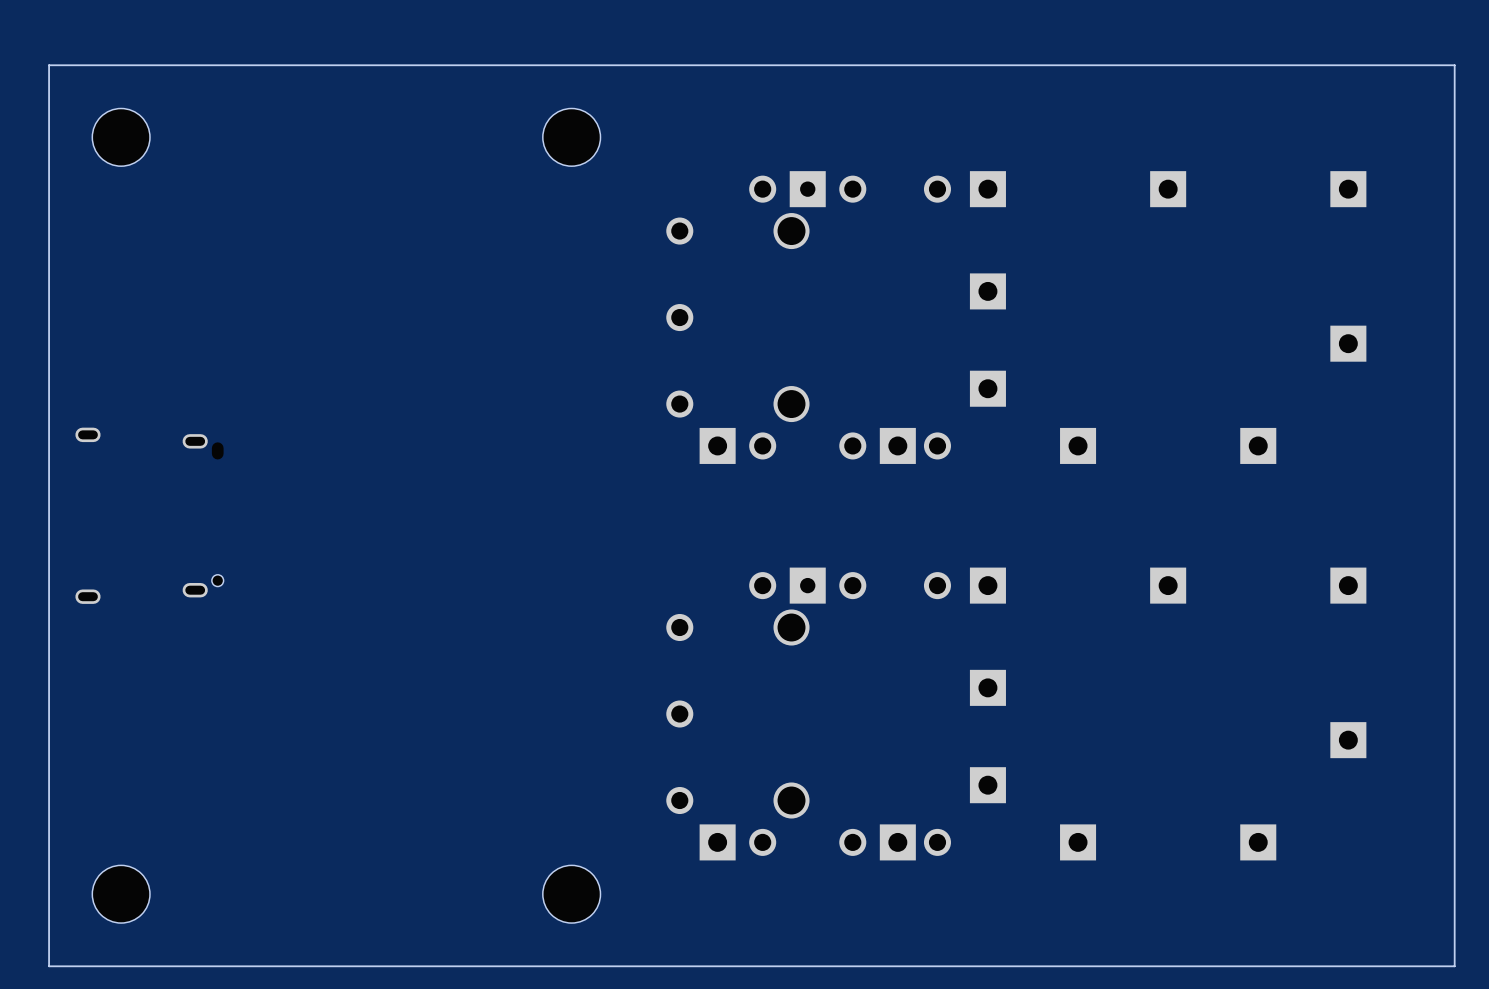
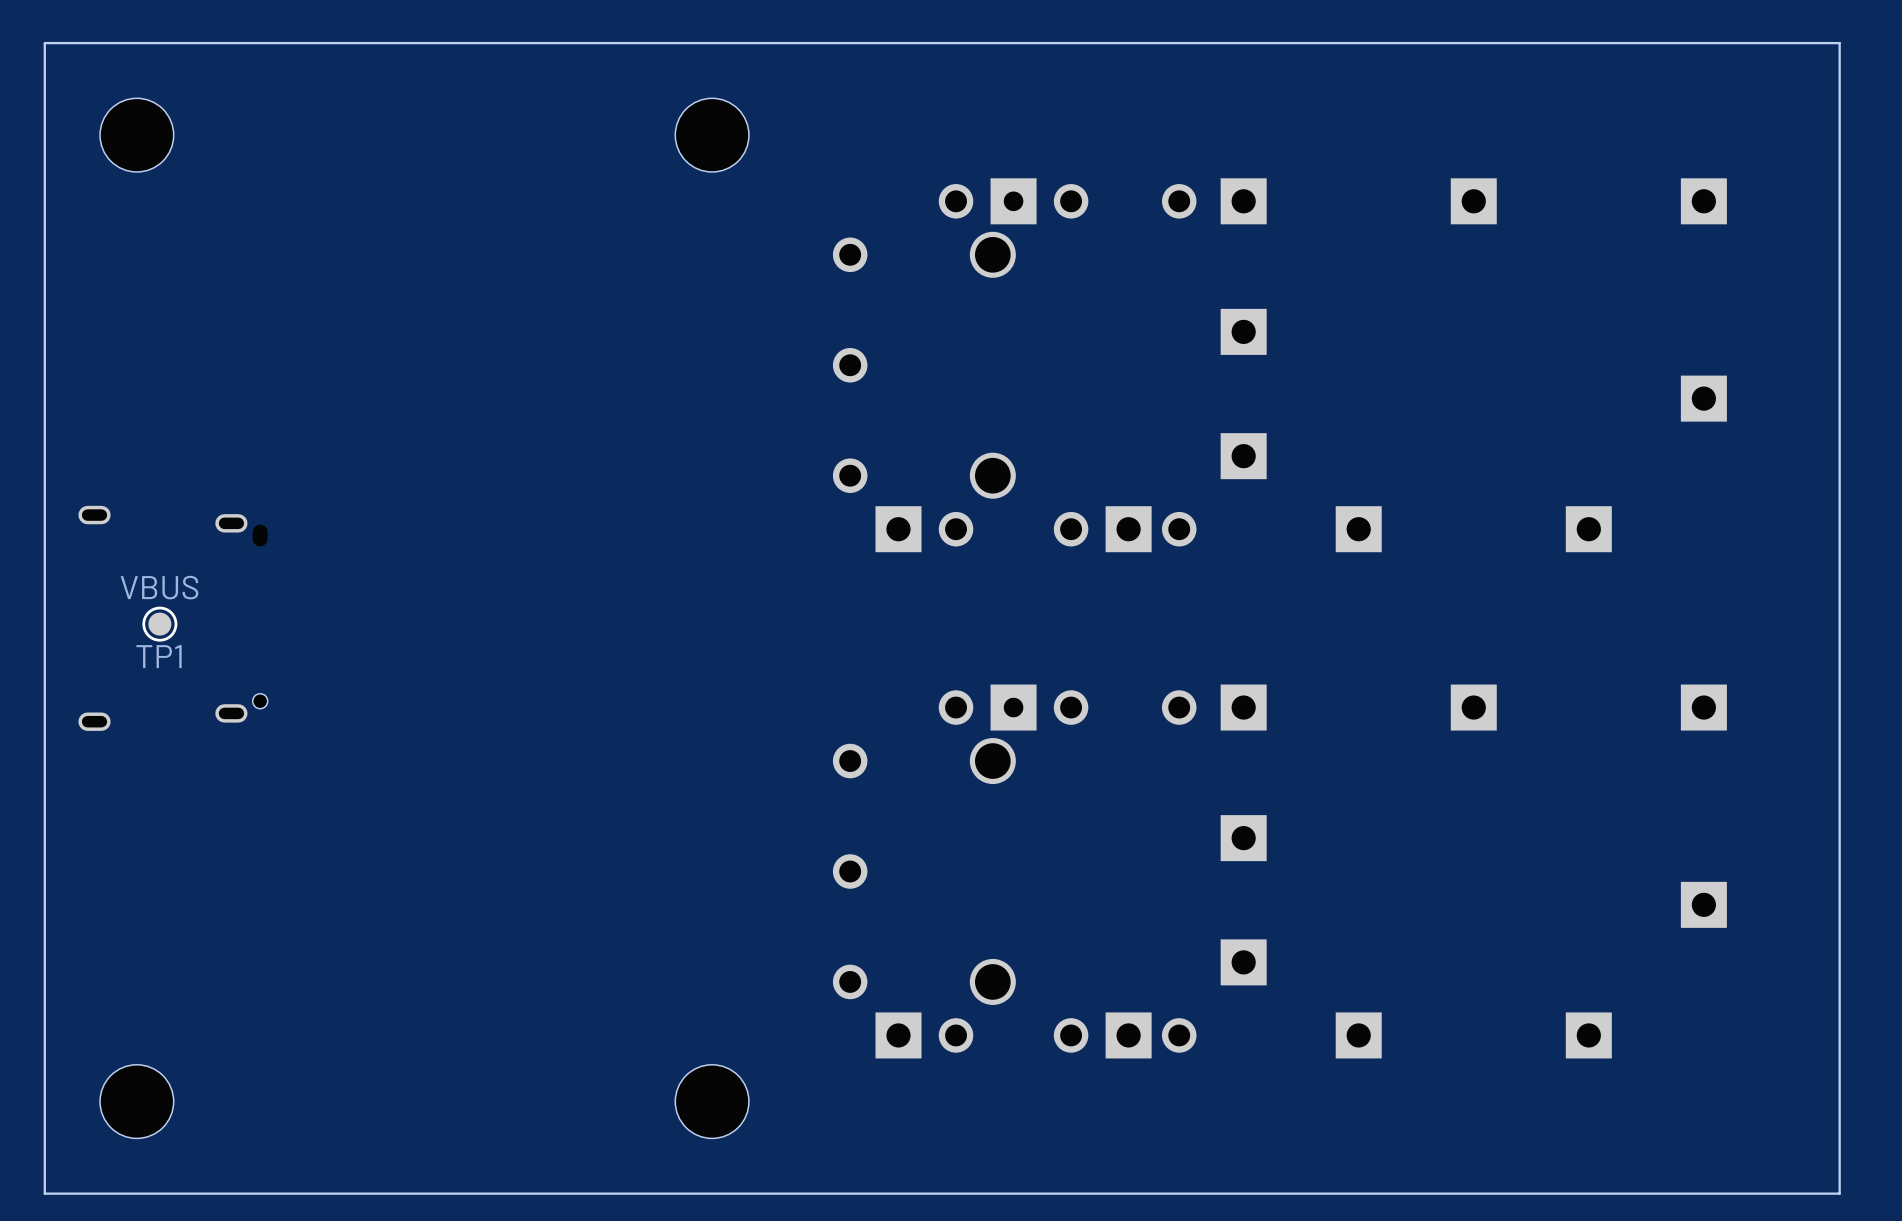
TP1: none -> VBUS (159, 624)

